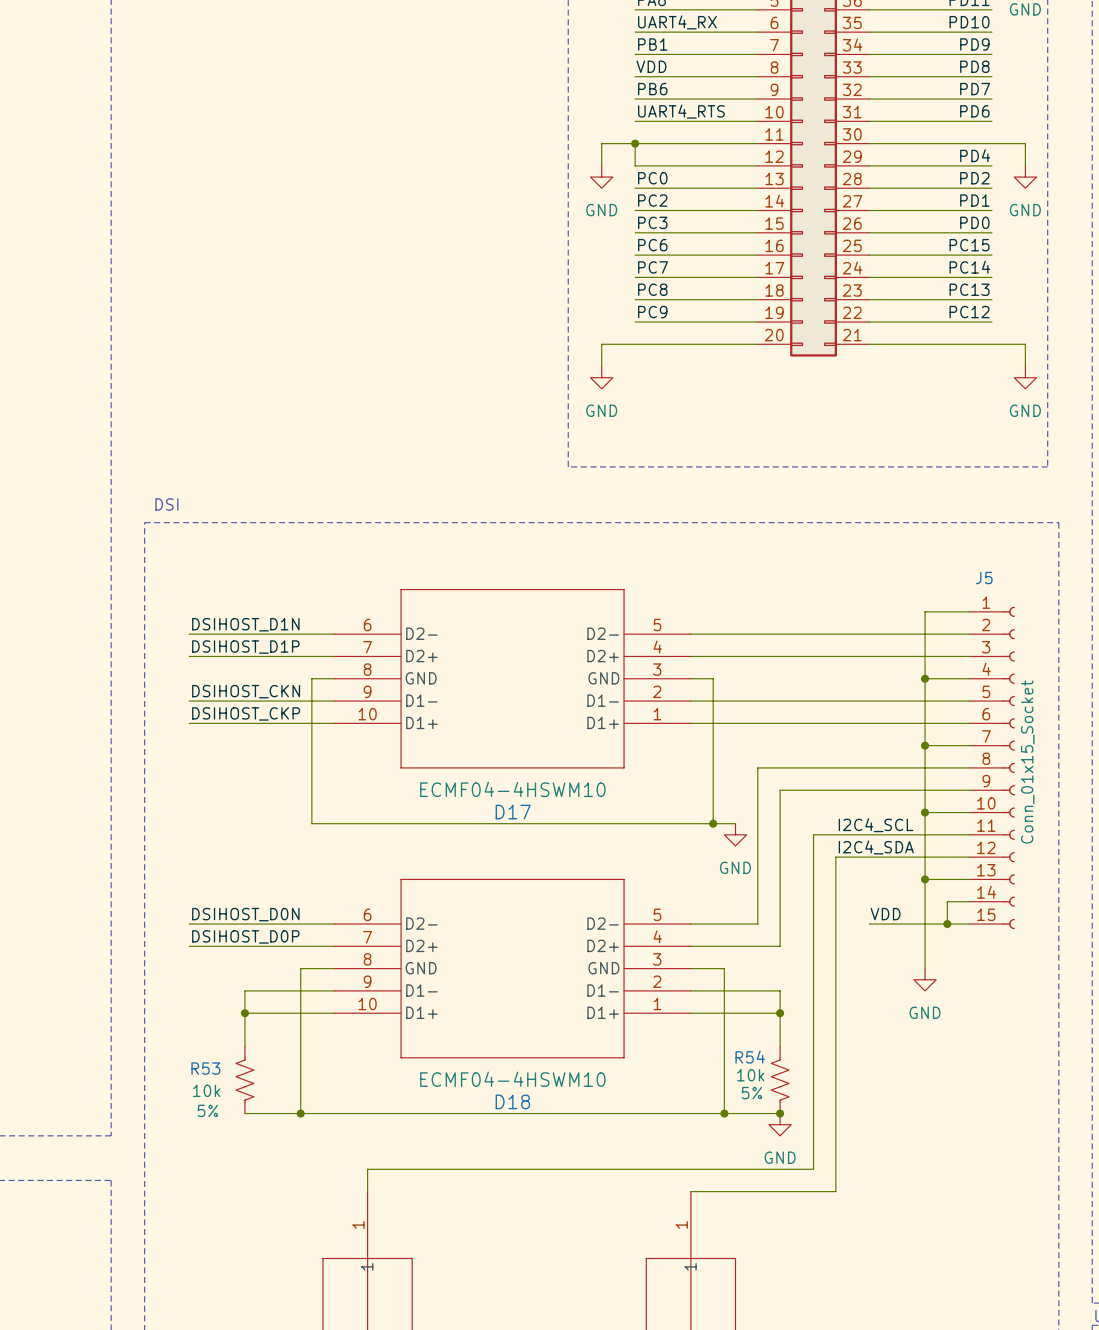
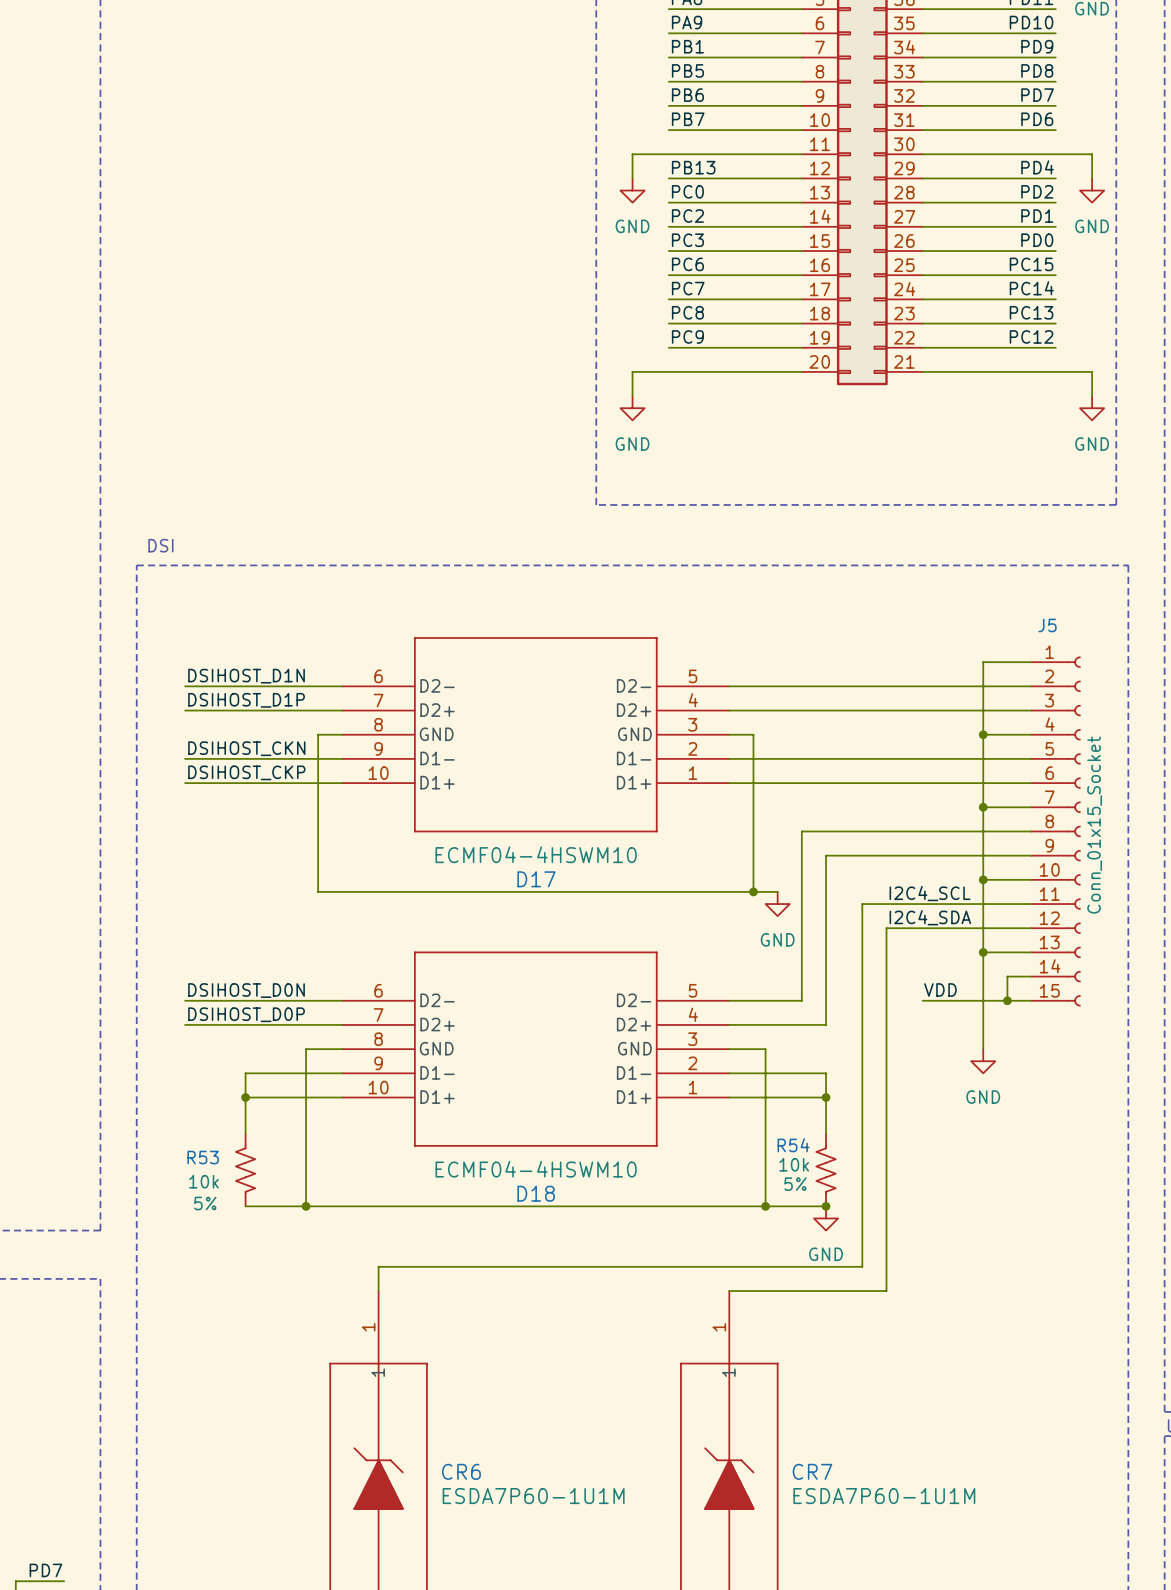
label: UART4_RX (677, 22) -> PA9 (687, 22)
label: VDD (651, 66) -> PB5 (687, 70)
label: UART4_RTS (681, 111) -> PB7 (688, 119)
wire: (635, 143) (635, 165) -> none
junction: (635, 143) -> none
label: none -> PB13 (693, 167)

